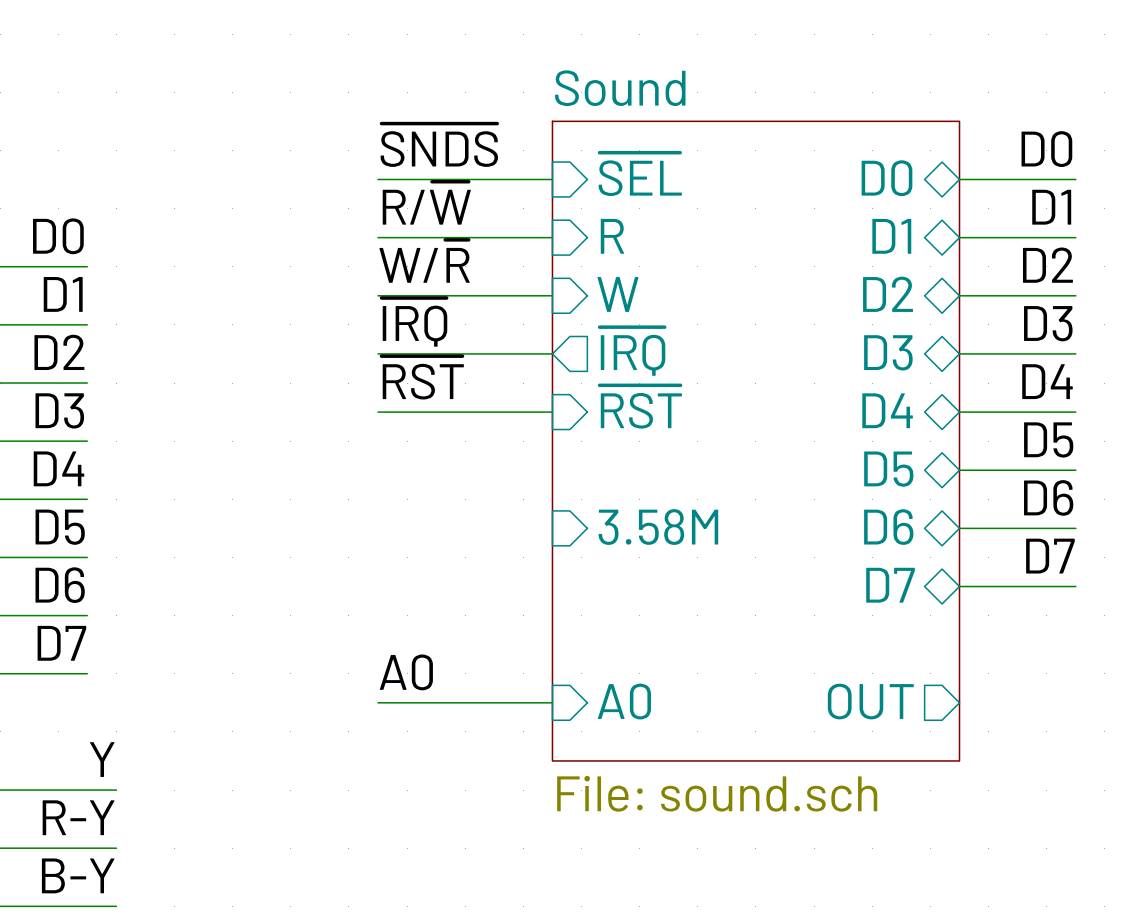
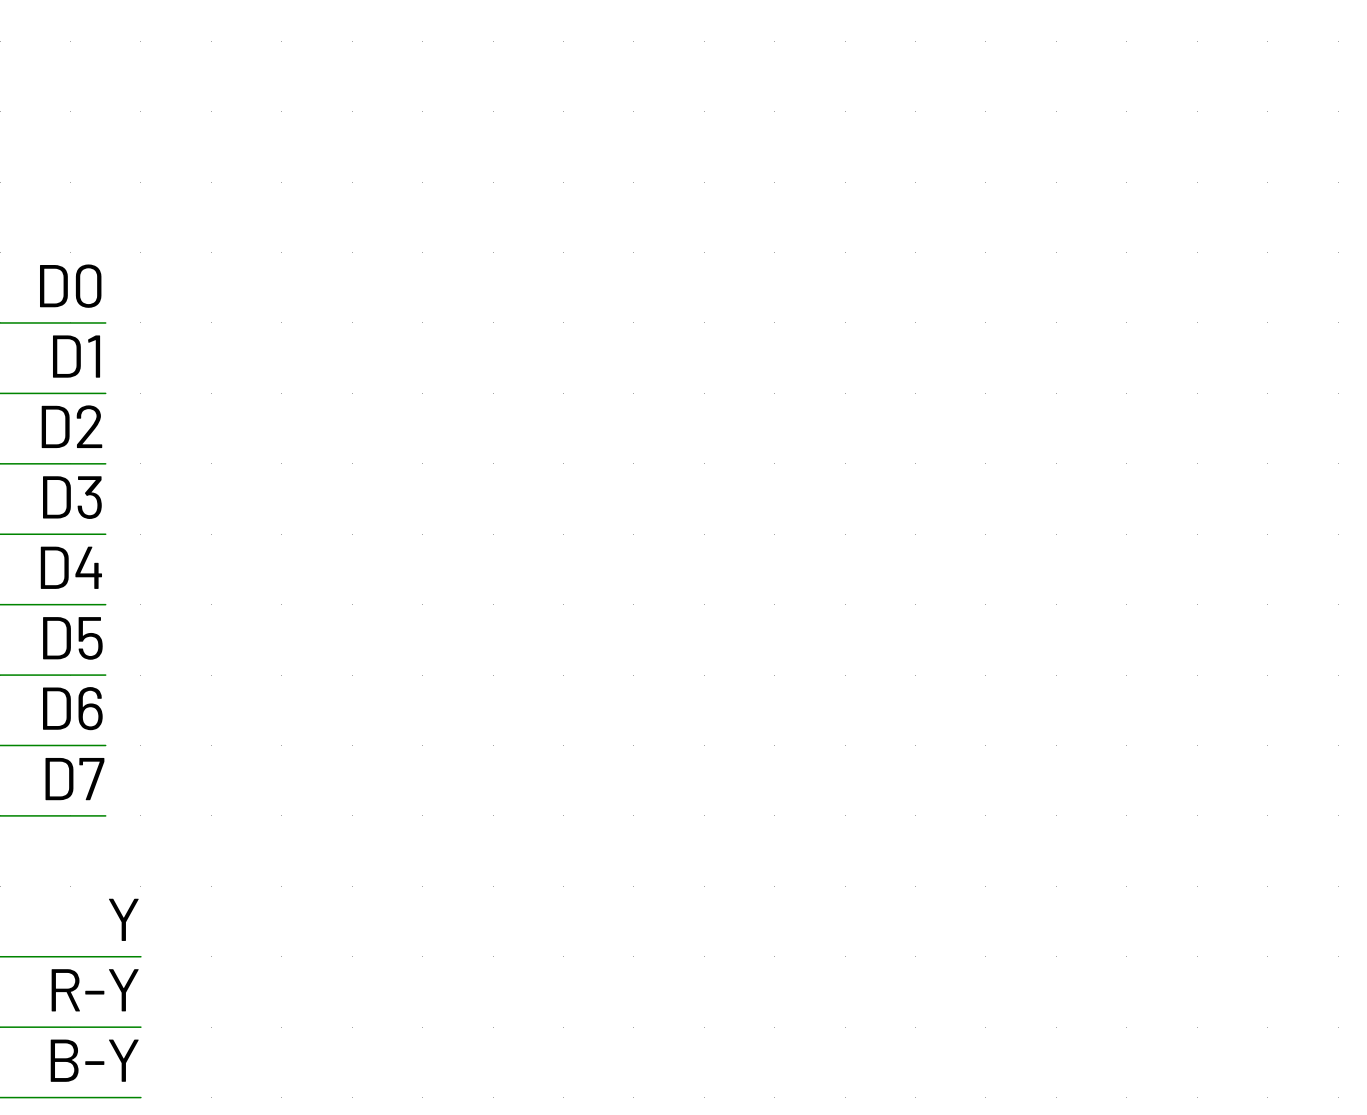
label: ~{SNDS} (439, 145) -> none
label: D0 (1046, 149) -> none
sheet pin: ~{SEL} (640, 174) -> none
sheet pin: D0 (886, 178) -> none
wire: (378, 179) (552, 179) -> none
wire: (959, 179) (1075, 179) -> none
label: R/~{W} (426, 203) -> none
label: D1 (1051, 207) -> none
sheet pin: R (612, 236) -> none
sheet pin: D1 (891, 236) -> none
wire: (378, 237) (552, 237) -> none
wire: (959, 237) (1075, 237) -> none
label: W/~{R} (424, 261) -> none
label: D2 (1047, 265) -> none
sheet pin: W (617, 294) -> none
sheet pin: D2 (888, 294) -> none
wire: (378, 295) (552, 295) -> none
wire: (959, 295) (1075, 295) -> none
label: ~{IRQ} (414, 322) -> none
label: D3 (1048, 323) -> none
sheet pin: ~{IRQ} (632, 351) -> none
sheet pin: D3 (888, 352) -> none
wire: (378, 353) (552, 353) -> none
wire: (959, 353) (1075, 353) -> none
label: ~{RST} (422, 377) -> none
label: D4 (1047, 381) -> none
sheet pin: ~{RST} (640, 406) -> none
sheet pin: D4 (887, 410) -> none
wire: (378, 412) (552, 412) -> none
wire: (959, 412) (1075, 412) -> none
label: D5 (1048, 439) -> none
sheet Sound: File: sound.sch (755, 441) -> none
sheet pin: D5 (888, 469) -> none
wire: (959, 470) (1075, 470) -> none
label: D6 (1048, 497) -> none
sheet pin: 3.58M (658, 527) -> none
sheet pin: D6 (888, 527) -> none
wire: (959, 528) (1075, 528) -> none
label: D7 (1050, 556) -> none
sheet pin: D7 (890, 585) -> none
wire: (959, 586) (1075, 586) -> none
label: A0 (406, 672) -> none
sheet pin: A0 (624, 701) -> none
sheet pin: OUT (870, 701) -> none
wire: (378, 702) (552, 702) -> none

